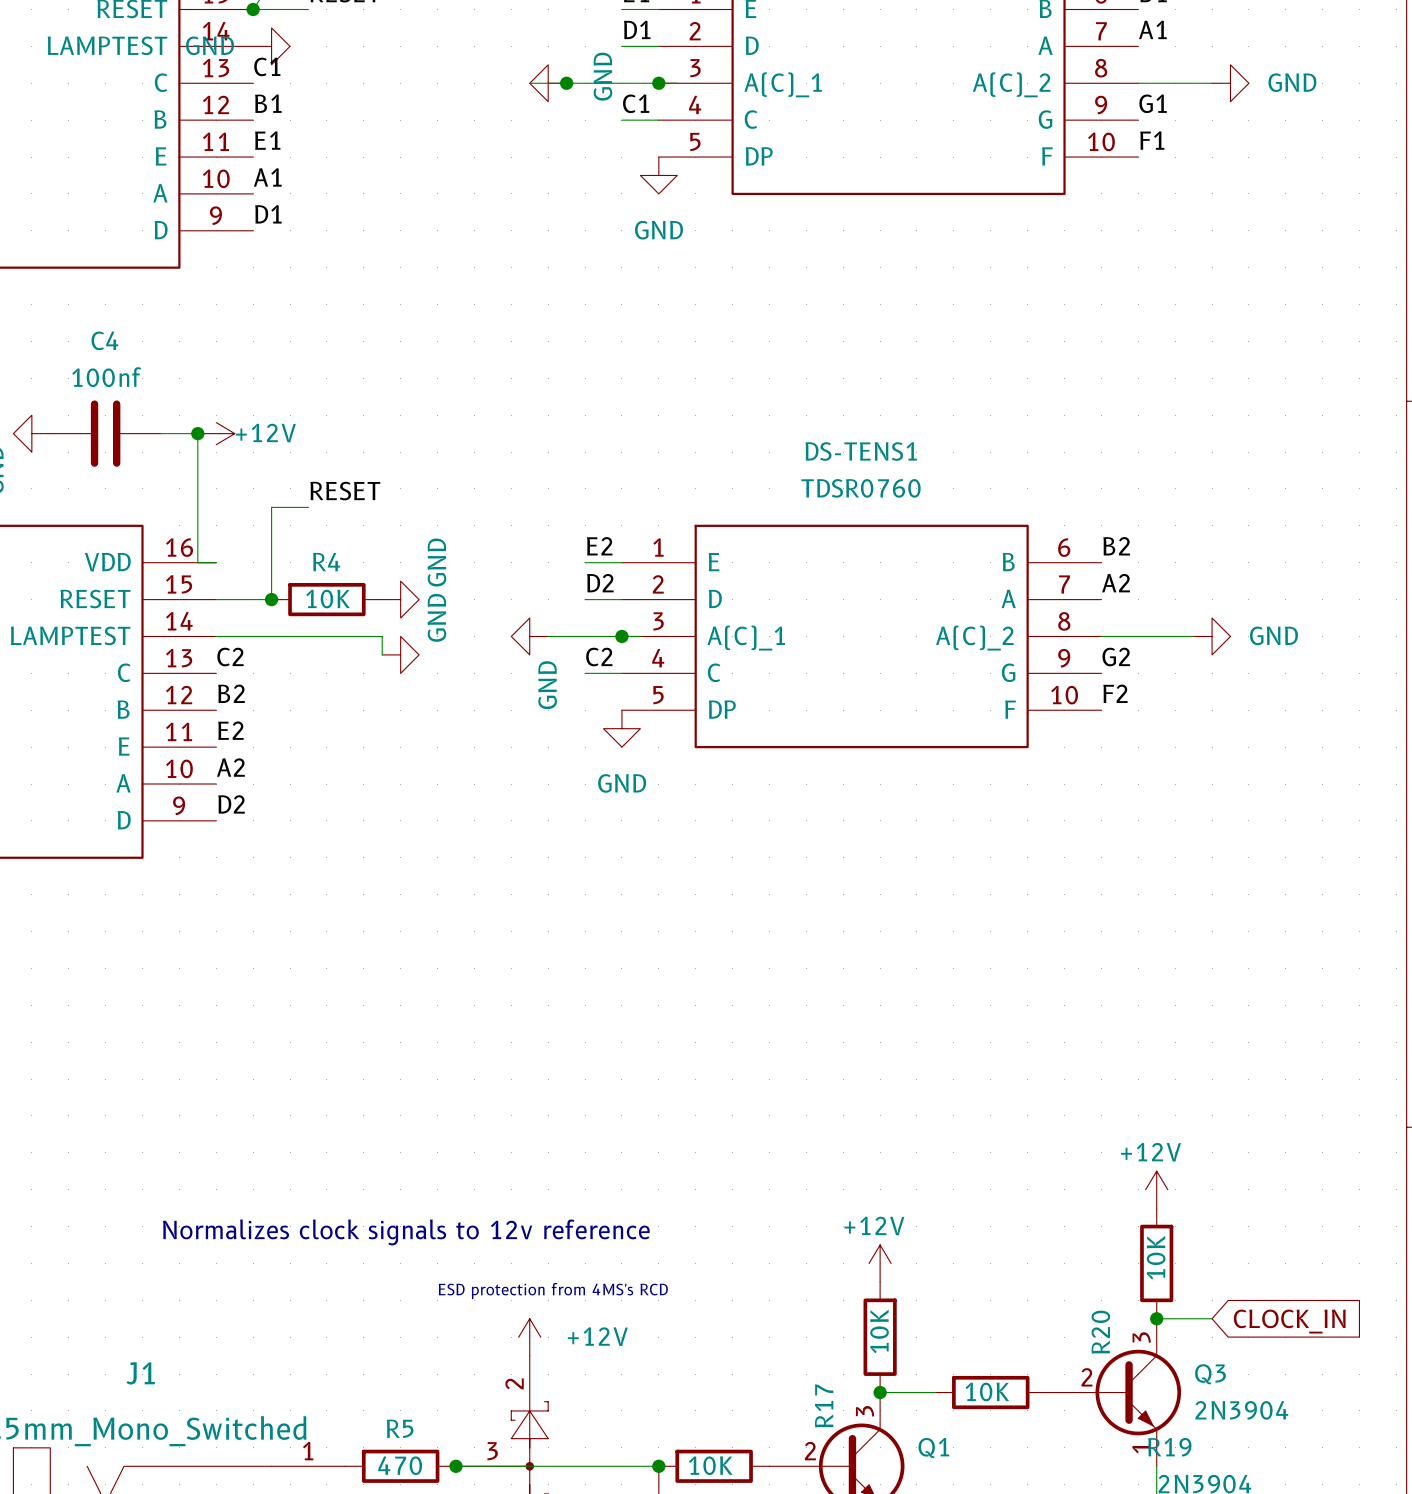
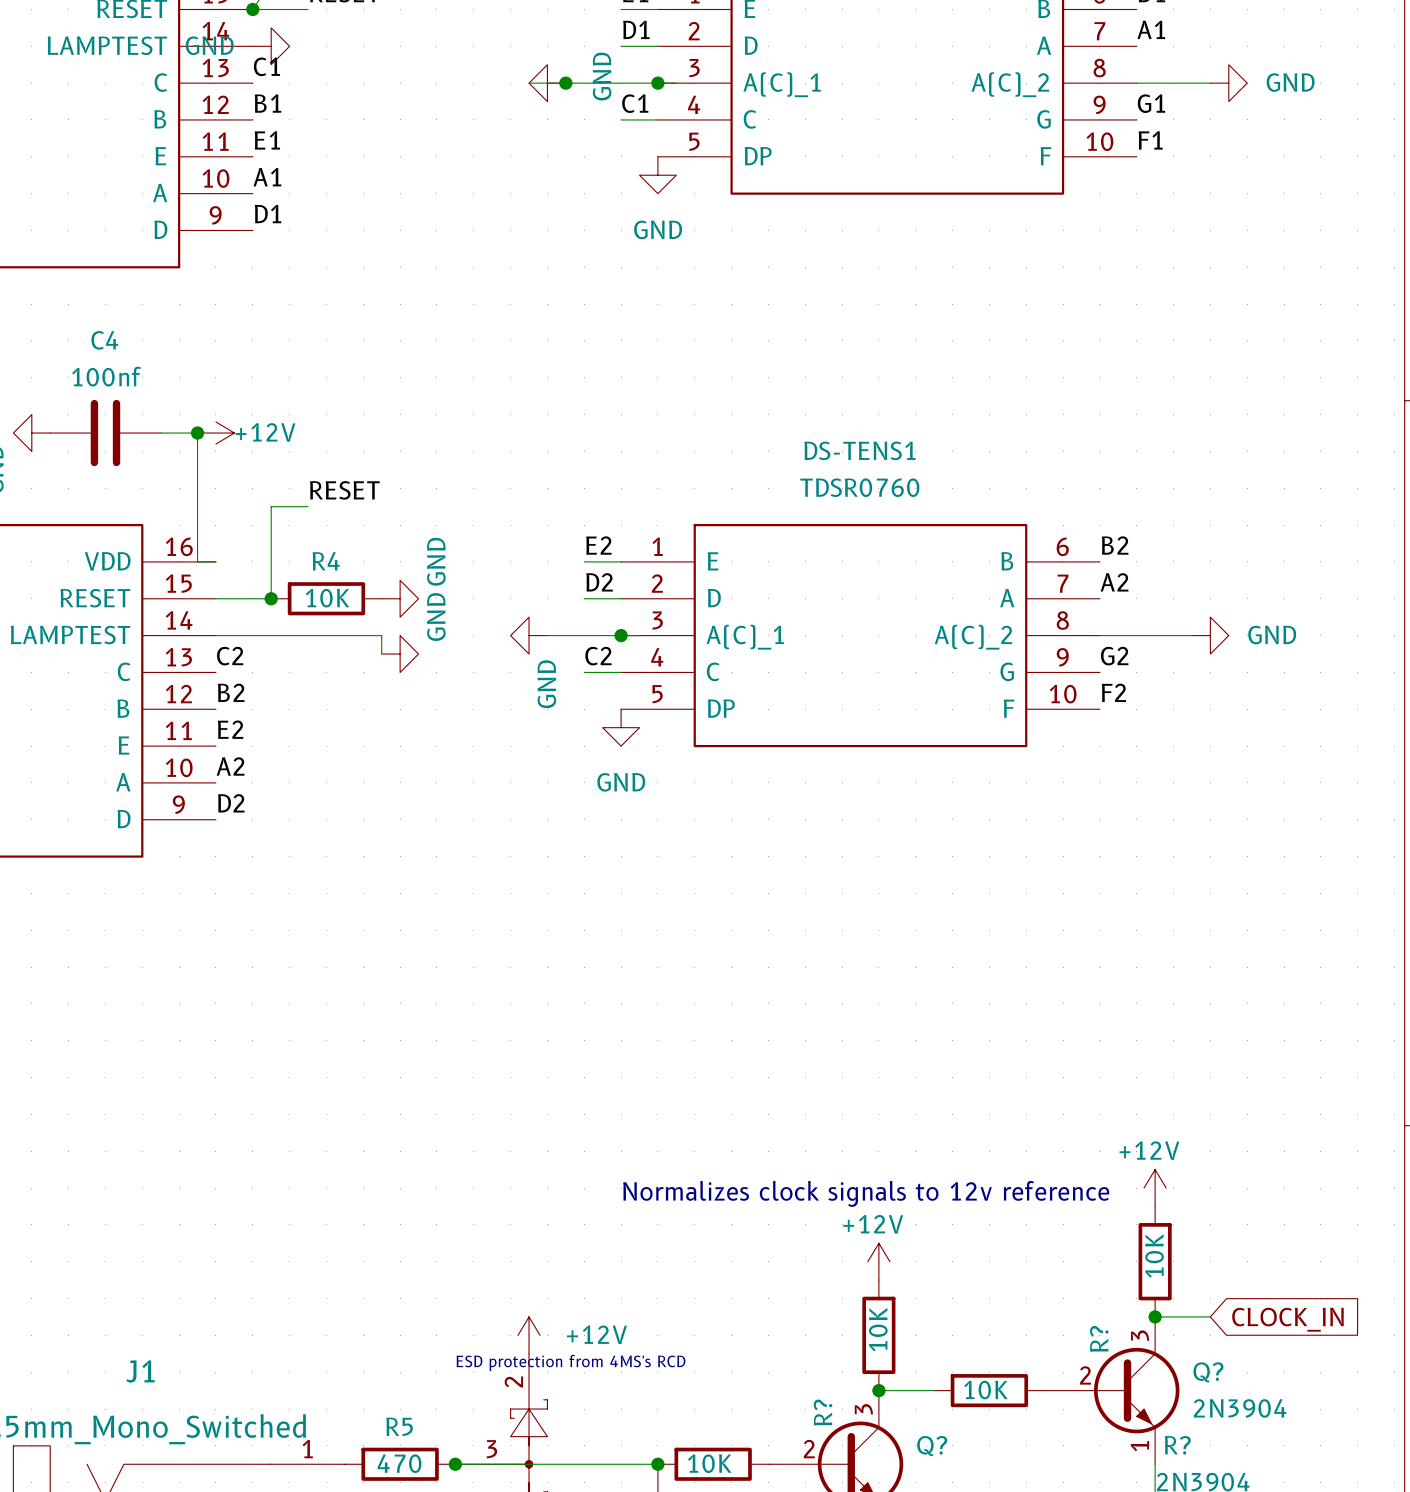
text: none -> Normalizes clock signals to 12v reference (866, 1193)
text: Normalizes clock signals to 12v reference (406, 1232) -> none
text position: ESD protection from 4MS's RCD (553, 1291) -> ESD protection from 4MS's RCD (570, 1362)
R20 name: R20 (1100, 1332) -> R? (1099, 1338)
Q3 name: Q3 (1210, 1374) -> Q? (1208, 1372)
R17 name: R17 (824, 1406) -> R? (823, 1412)
R19 name: R19 (1169, 1447) -> R? (1177, 1445)
Q1 name: Q1 (933, 1448) -> Q? (932, 1446)

